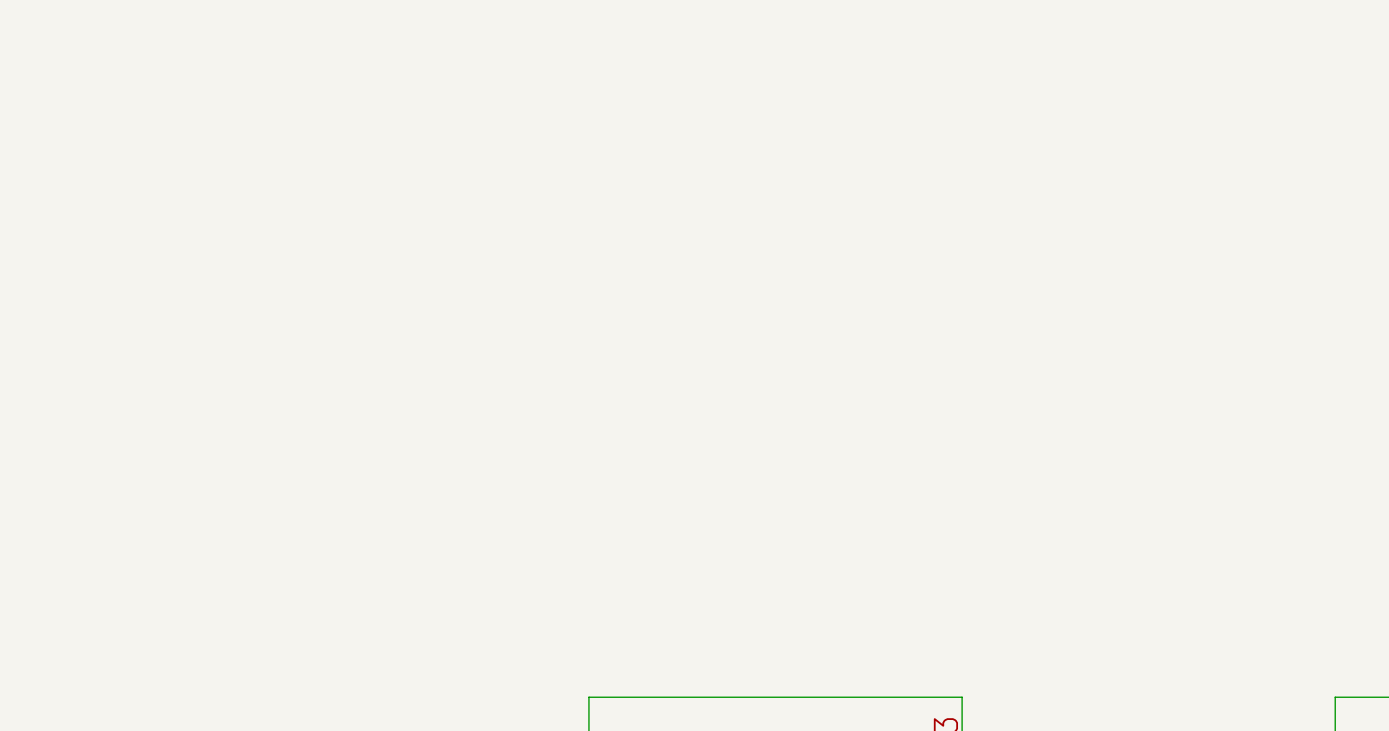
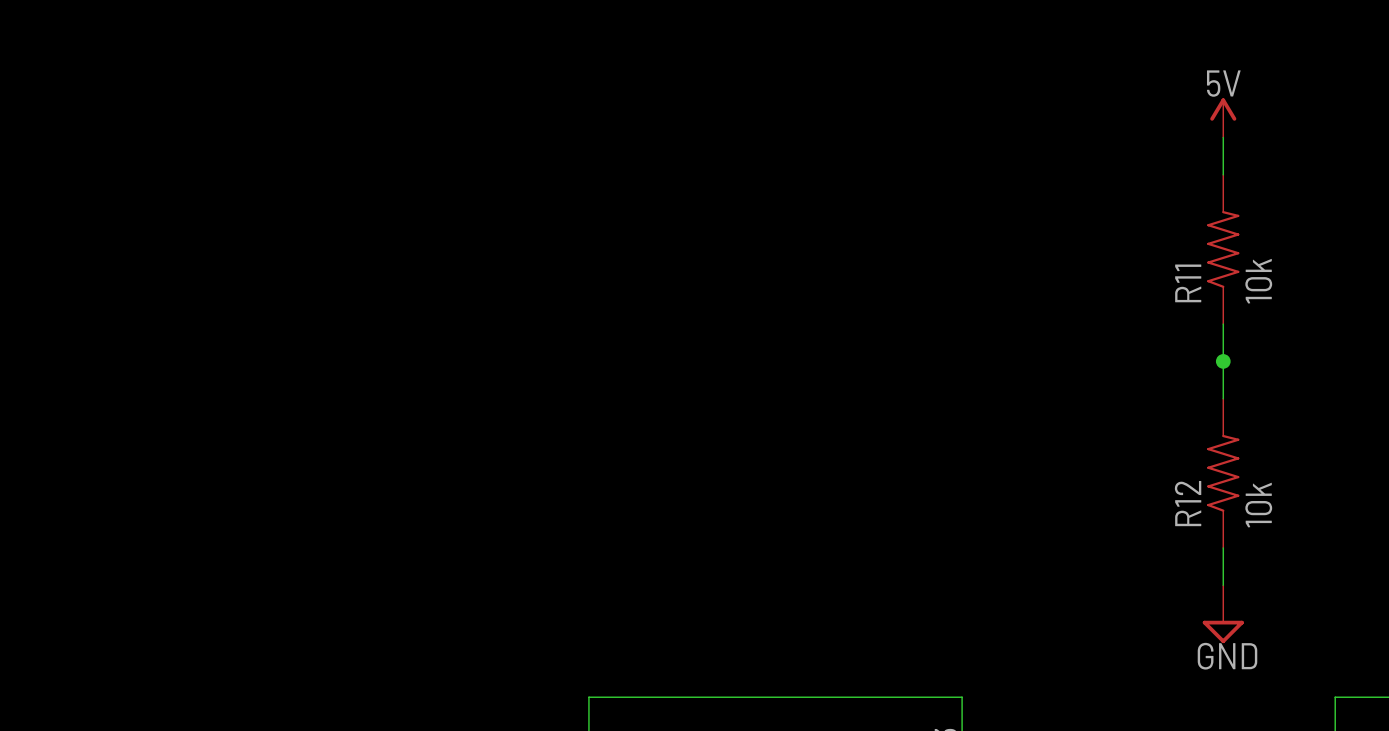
power symbol: none -> 5V (1223, 117)
wire: none -> (1223, 137) (1223, 174)
R11: none -> 10k (1223, 249)
wire: none -> (1223, 324) (1223, 398)
junction: none -> (1223, 361)
R12: none -> 10k (1223, 473)
wire: none -> (1223, 547) (1223, 585)
power symbol: none -> GND (1223, 614)

